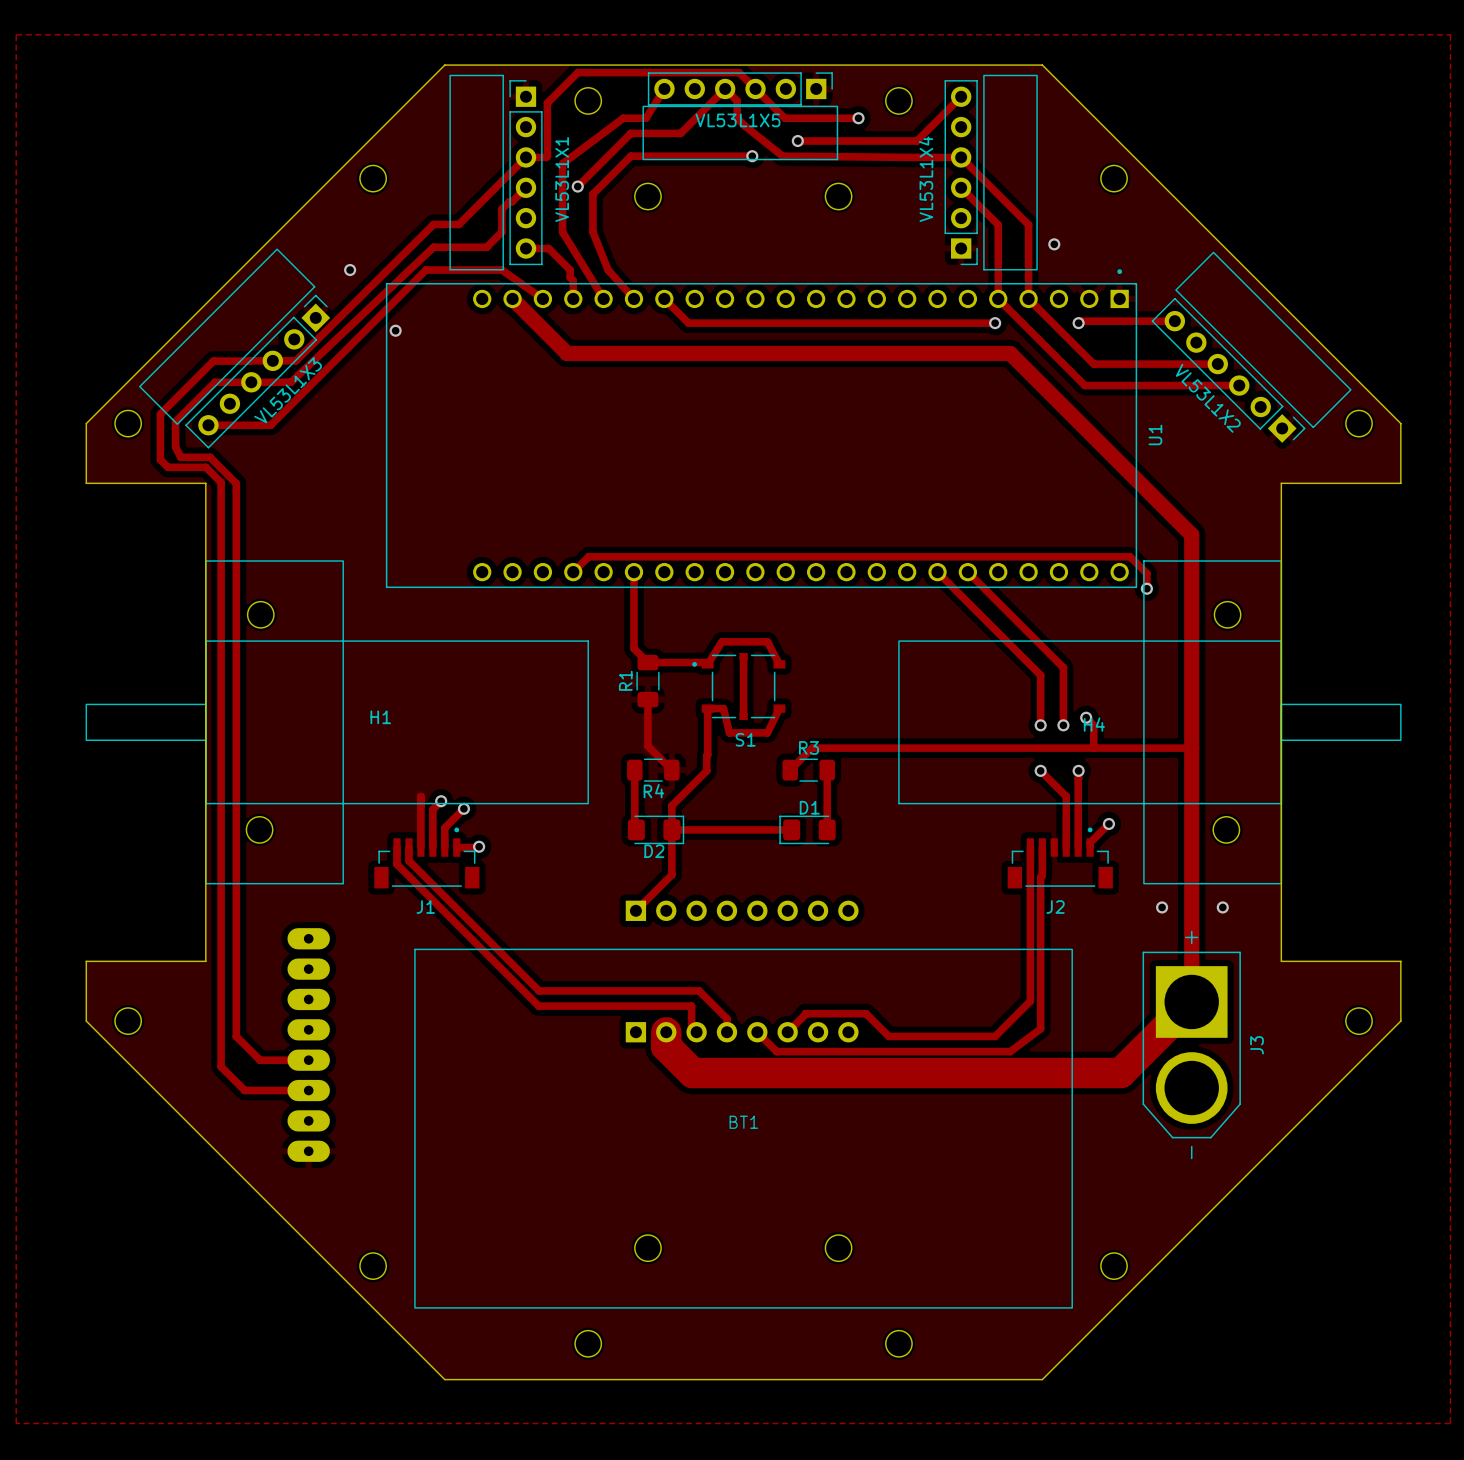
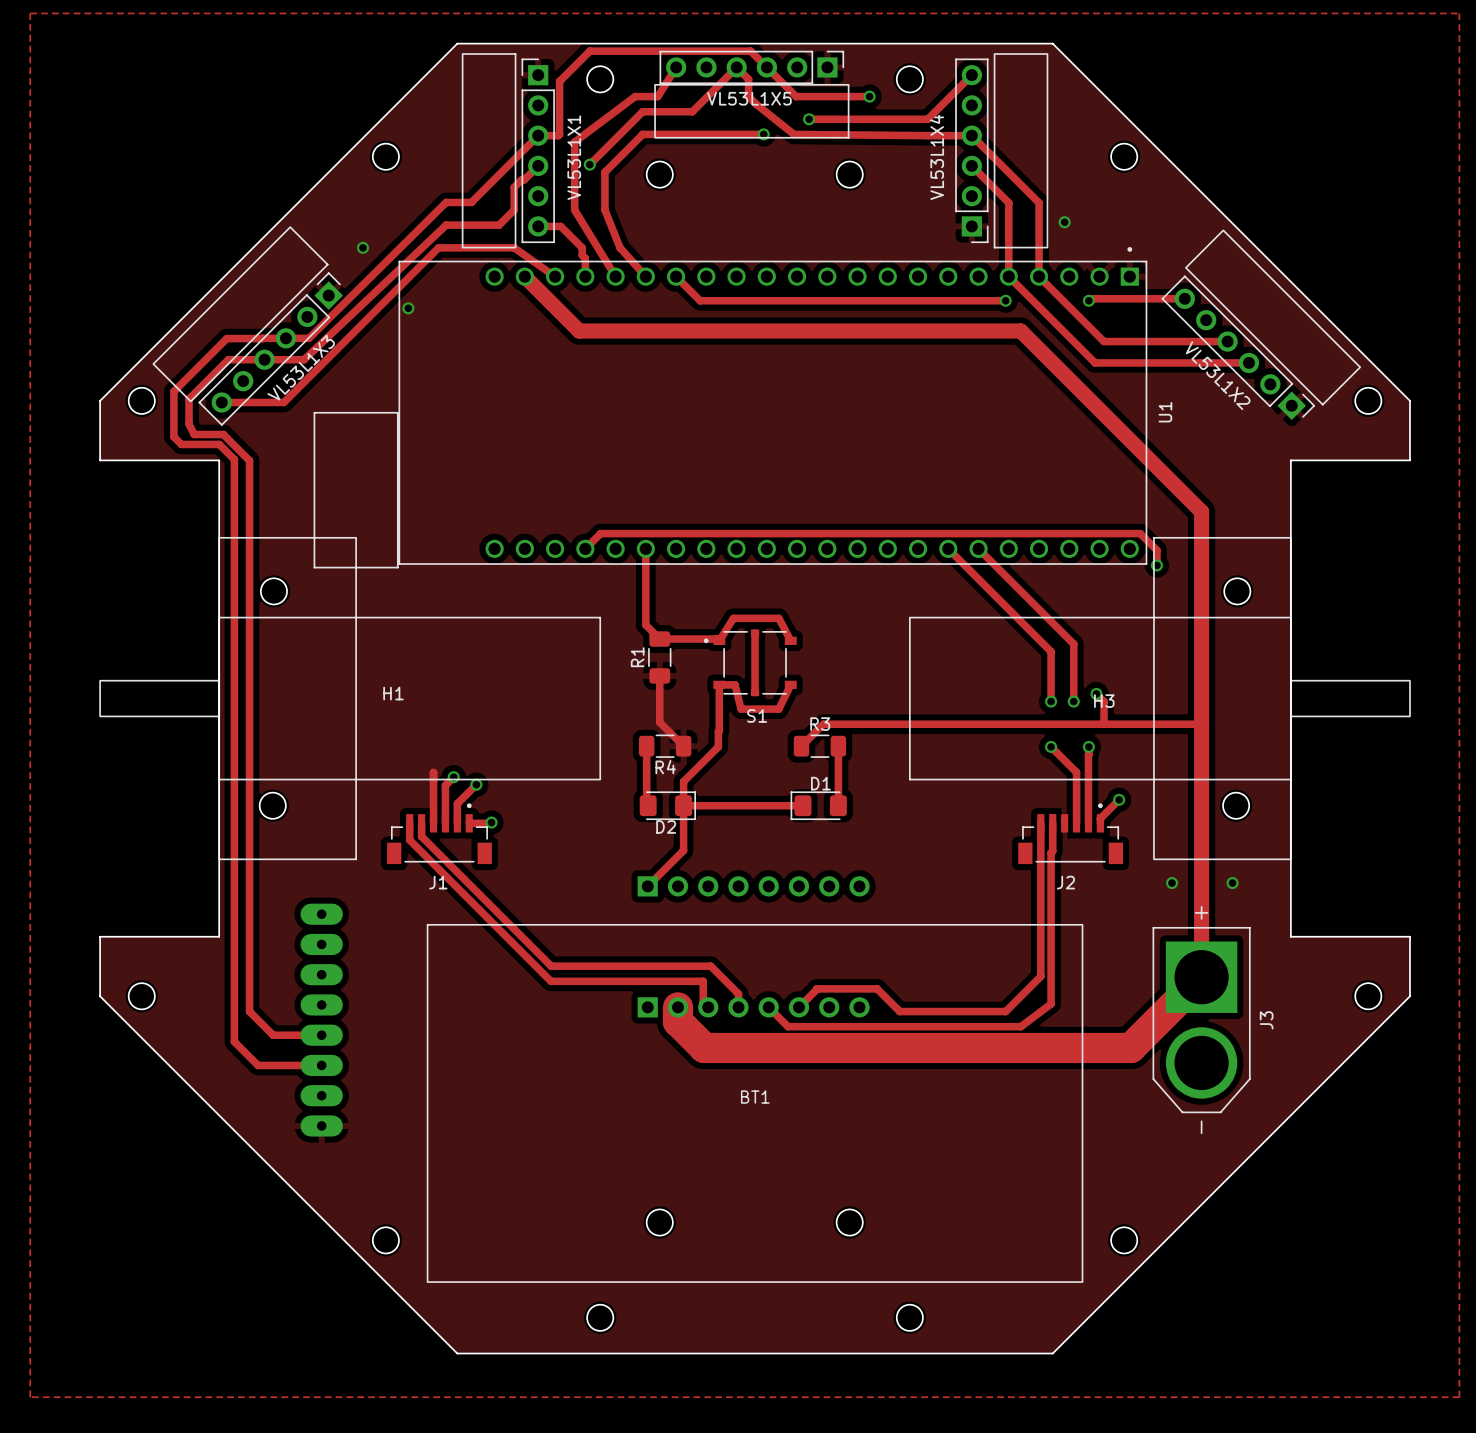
line: none -> (314, 412) (397, 412) (397, 567) (314, 567) (314, 412)
H4 name: H4 (1094, 724) -> H3 (1104, 701)

